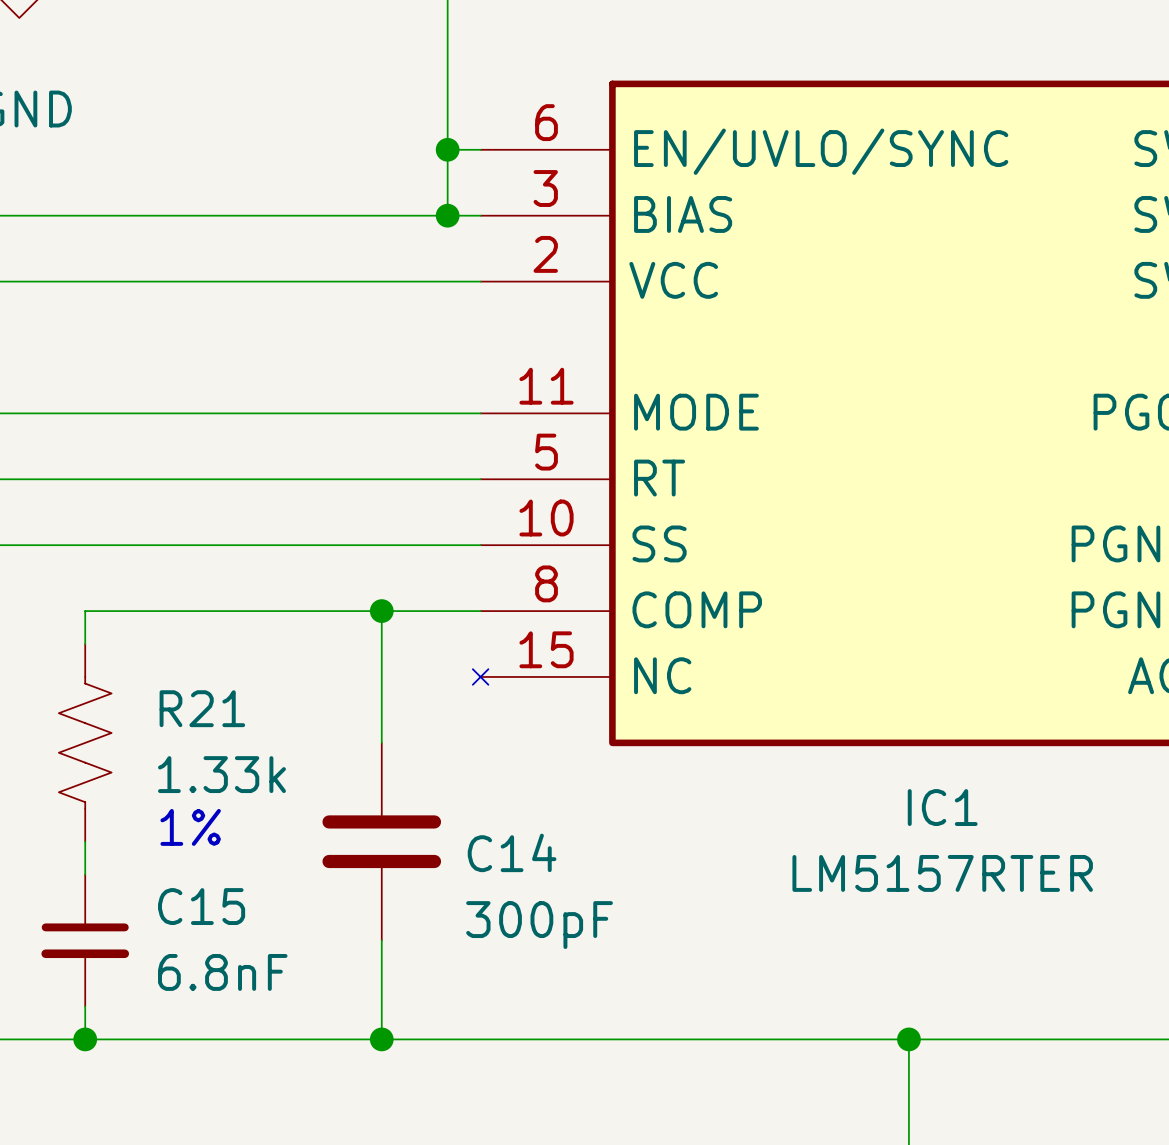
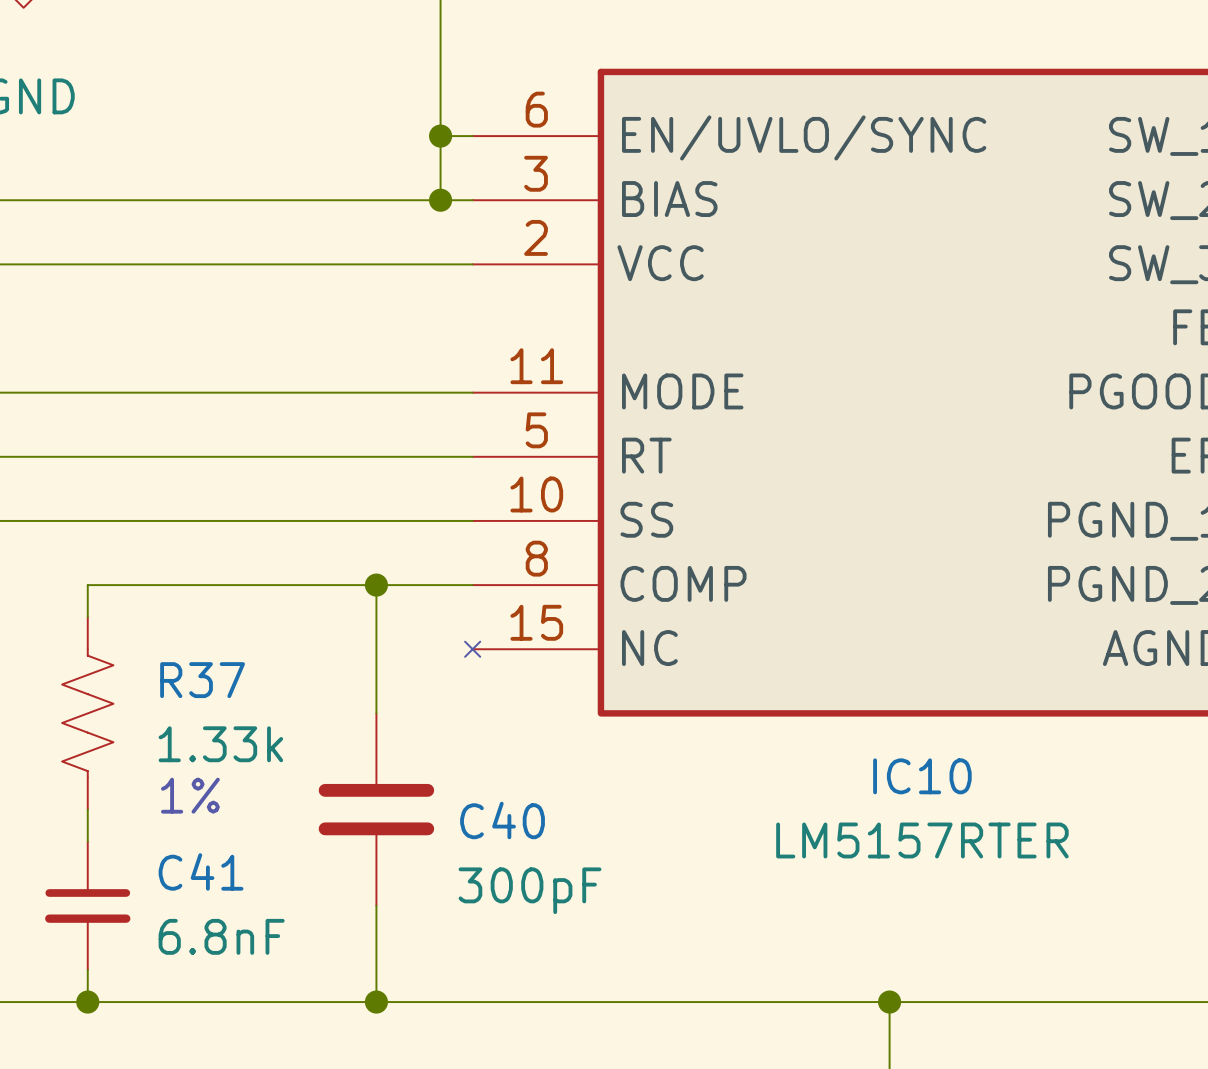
R21 name: R21 (202, 708) -> R37 (202, 680)
IC1 name: IC1 (942, 807) -> IC10 (922, 776)
C14 name: C14 (512, 852) -> C40 (502, 820)
C15 name: C15 (201, 906) -> C41 (201, 871)

